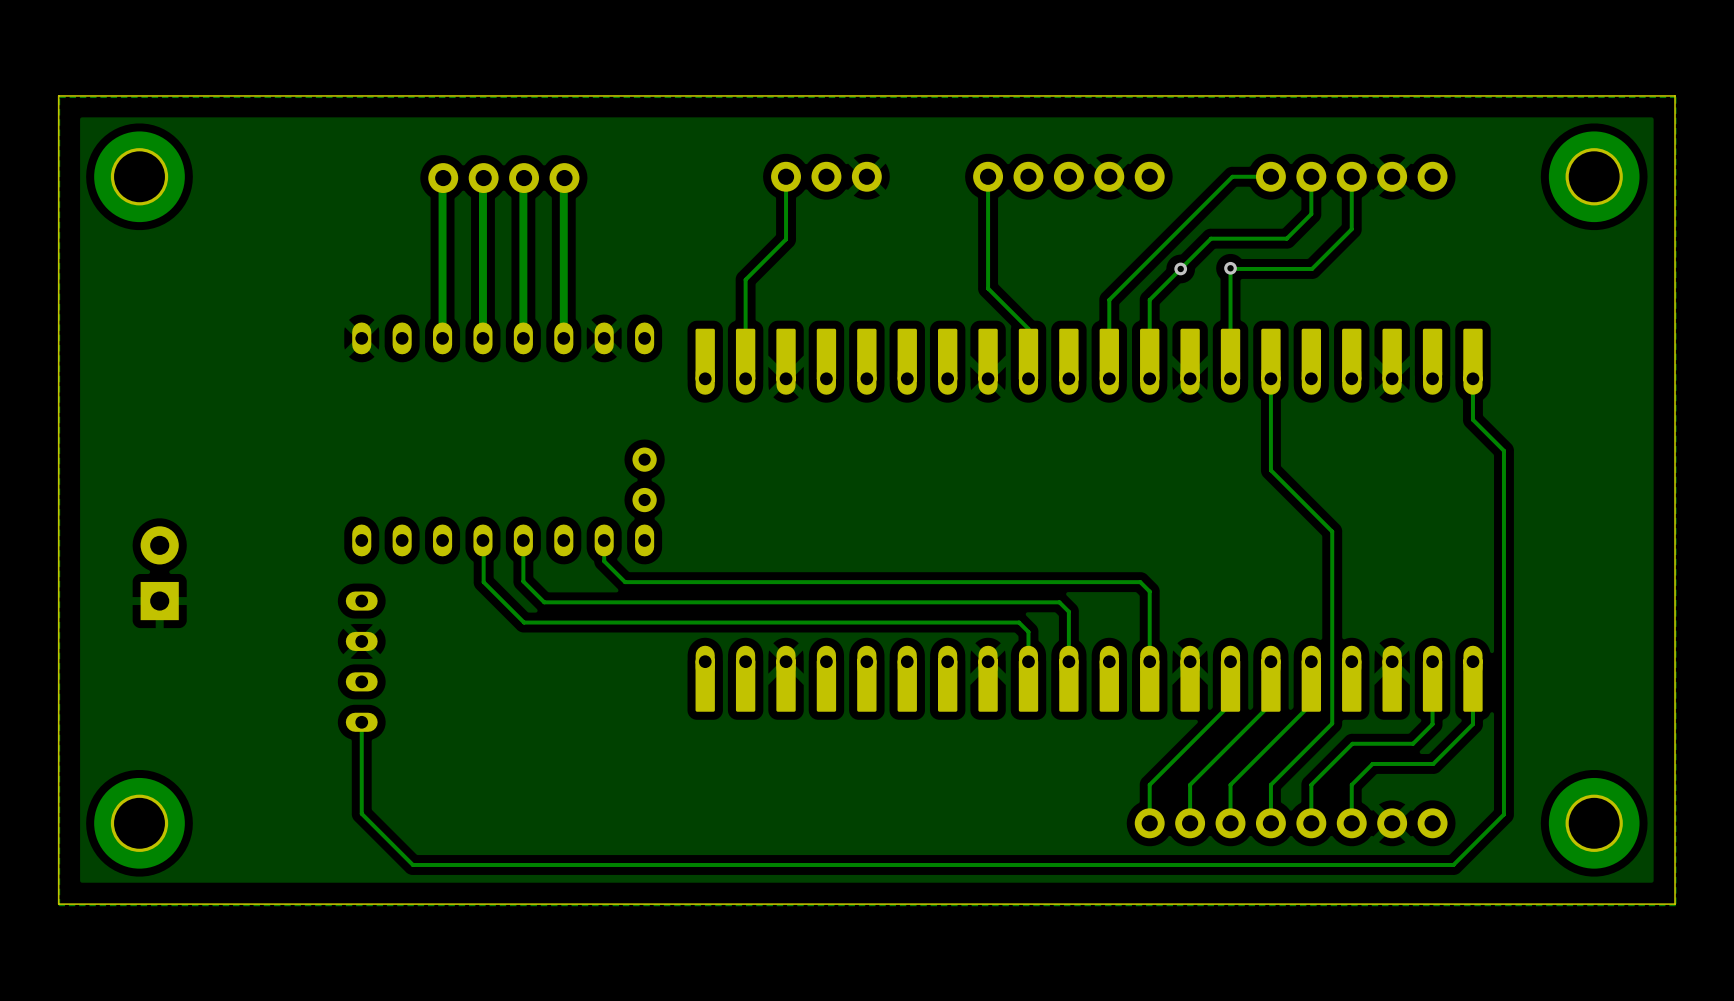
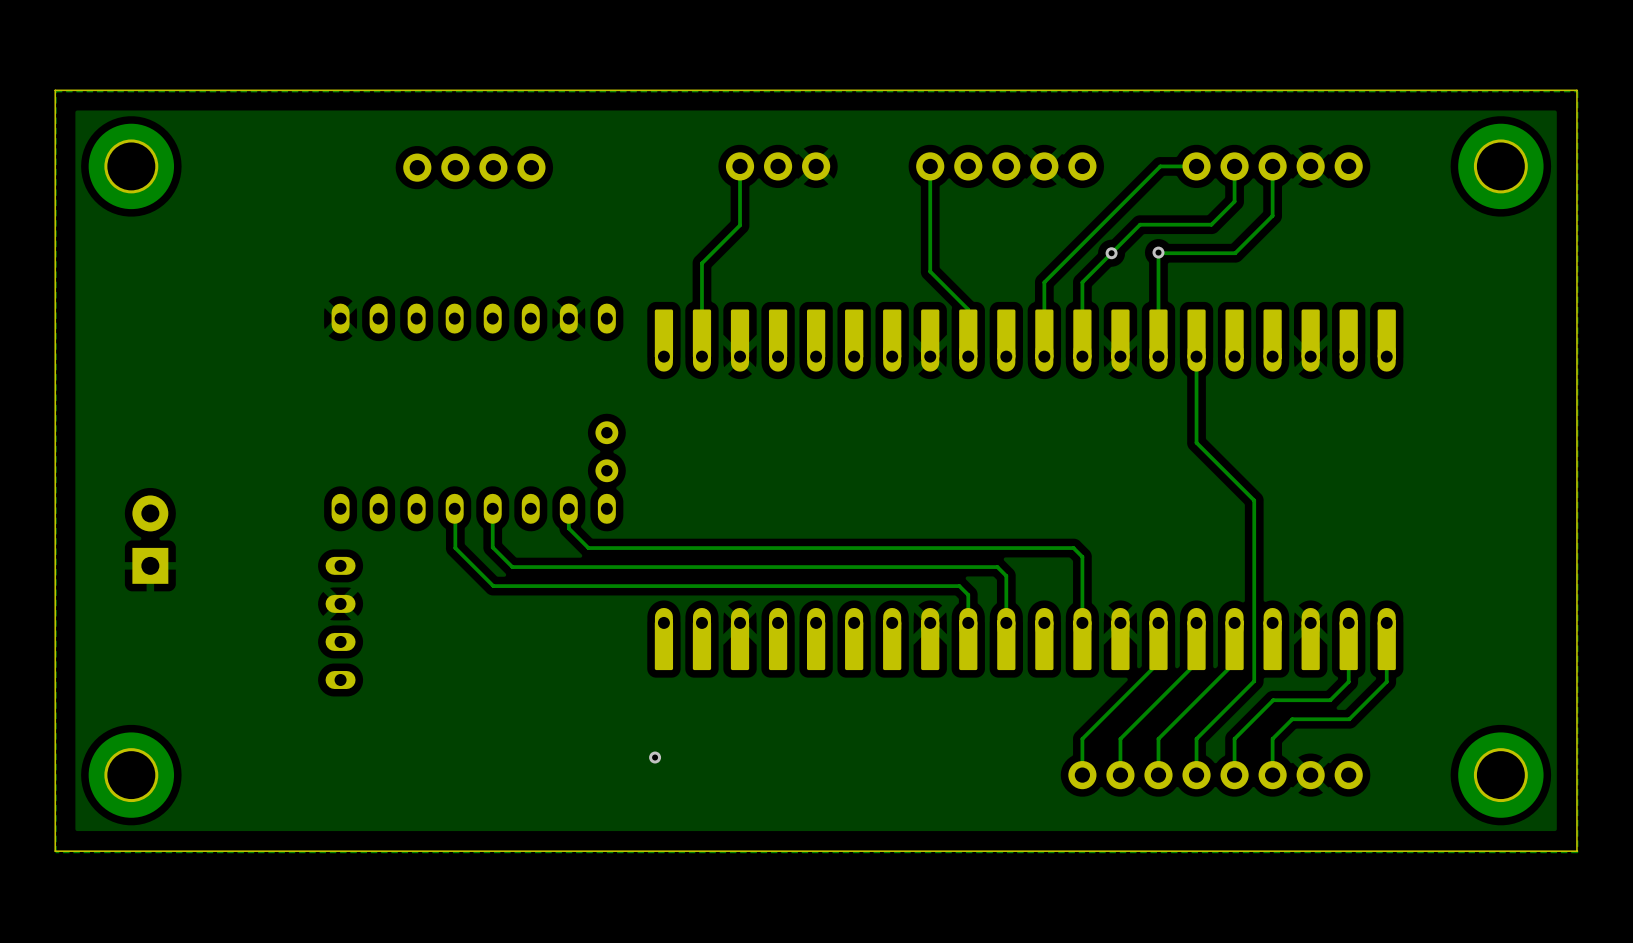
track: (442, 178) (442, 338) -> none
track: (482, 178) (482, 338) -> none
track: (523, 178) (523, 338) -> none
track: (563, 178) (563, 338) -> none
track: (1472, 378) (1472, 419) (1503, 450) (1503, 814) (1453, 864) (412, 864) (361, 813) (361, 722) -> none
via: none -> (655, 757)

